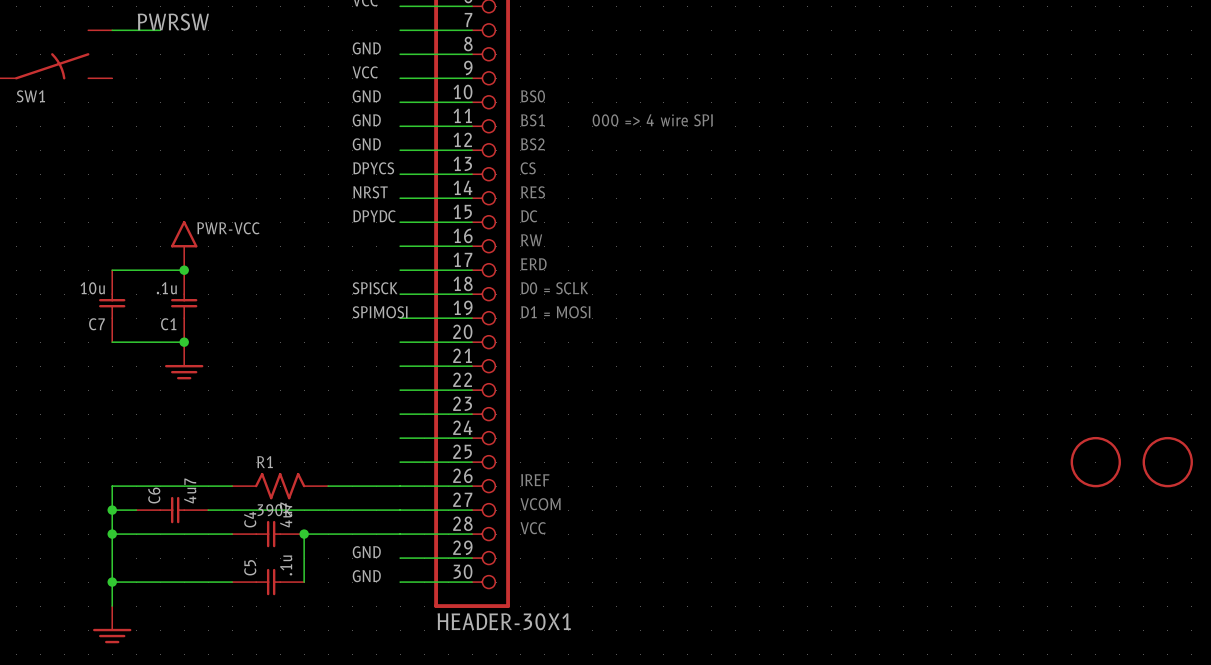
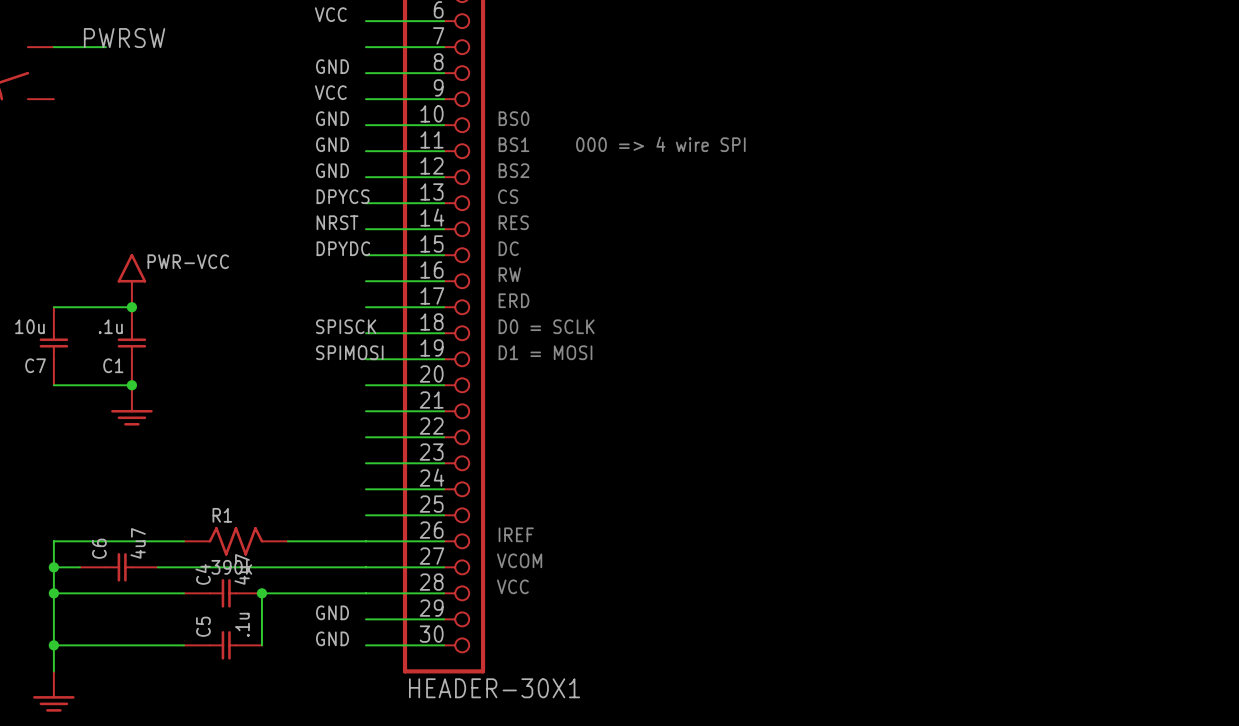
part: (1095, 462) -> none
part: (1167, 462) -> none

